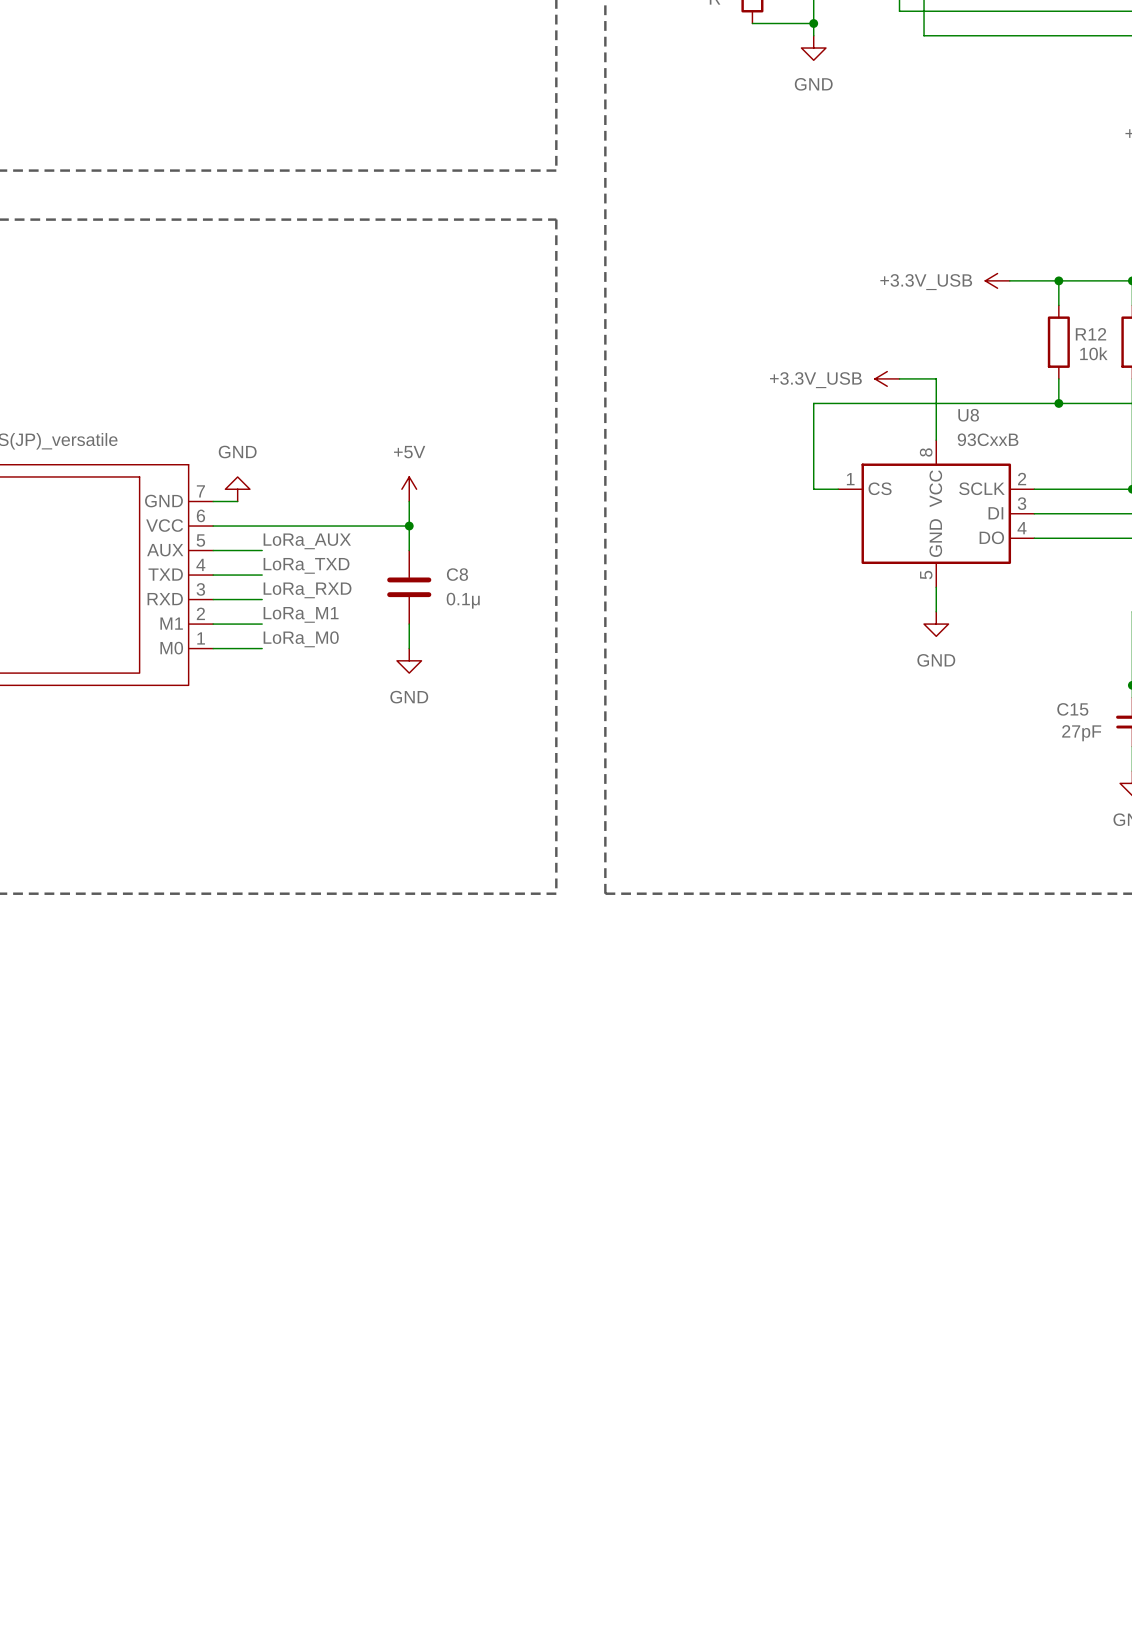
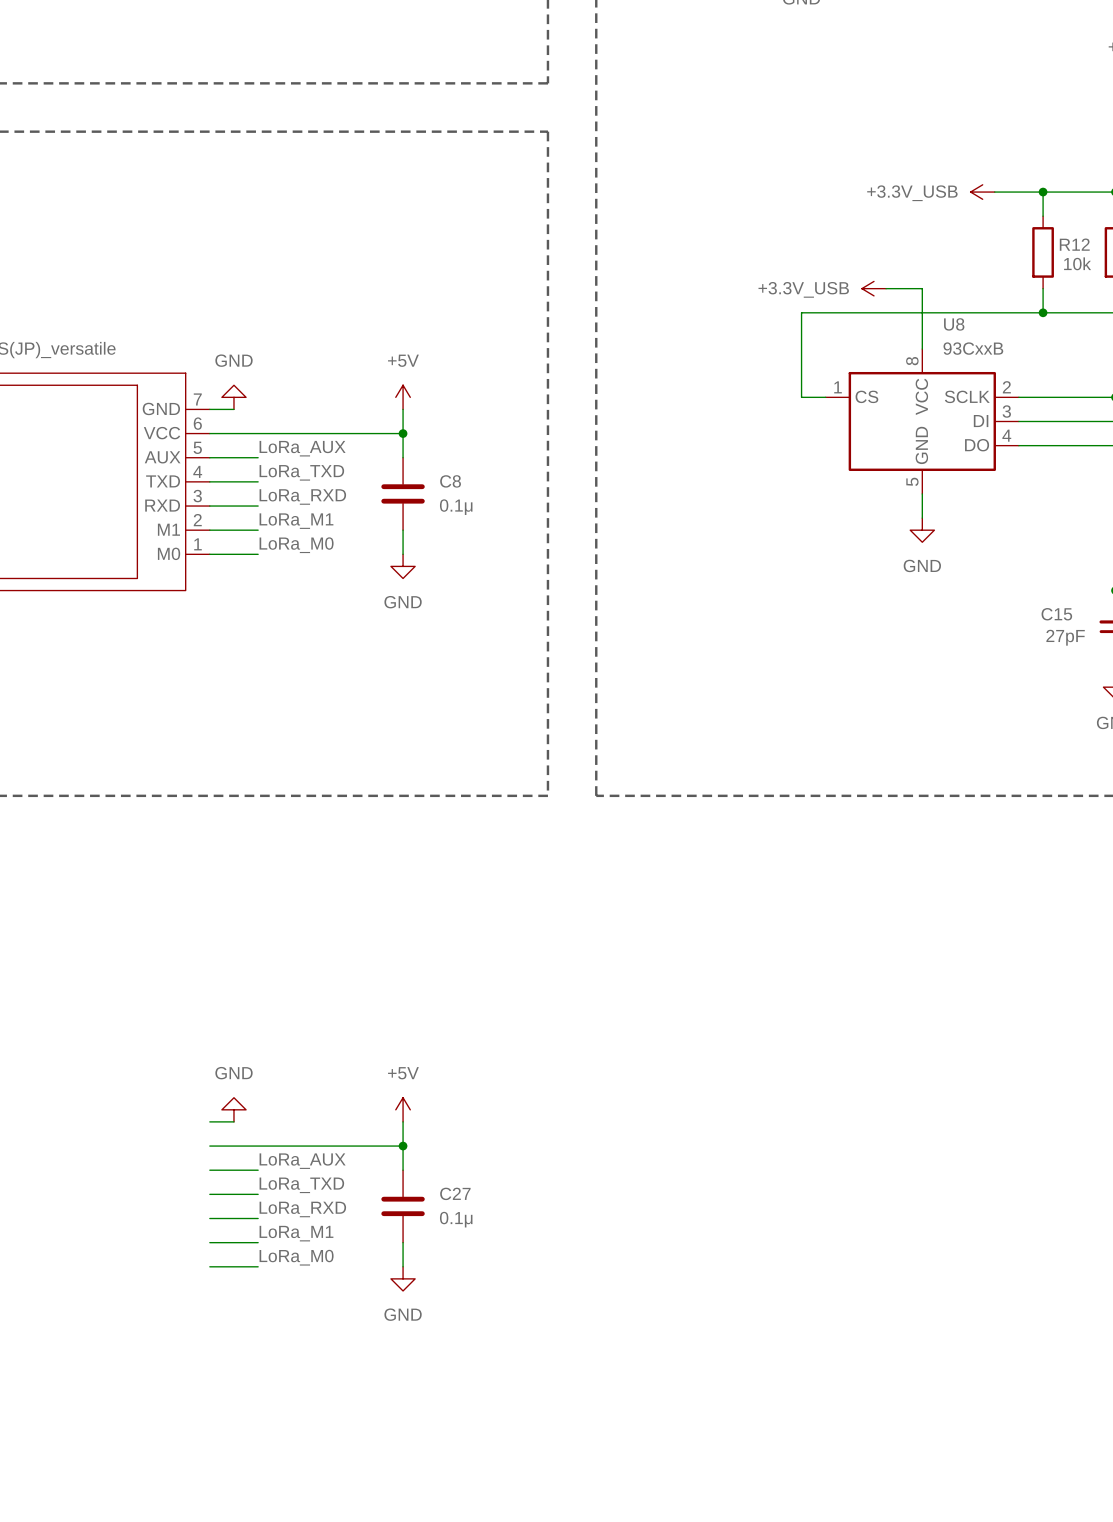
power symbol: none -> GND (233, 1109)
power symbol: none -> +5V (403, 1109)
wire: none -> (209, 1121) (233, 1121)
wire: none -> (403, 1121) (403, 1170)
wire: none -> (209, 1146) (403, 1146)
junction: none -> (403, 1146)
label: none -> LoRa_AUX (302, 1161)
wire: none -> (209, 1170) (258, 1170)
label: none -> LoRa_TXD (301, 1185)
wire: none -> (209, 1194) (258, 1194)
C27: none -> 0.1μ (403, 1206)
label: none -> LoRa_RXD (302, 1209)
wire: none -> (209, 1218) (258, 1218)
label: none -> LoRa_M1 (296, 1233)
wire: none -> (209, 1242) (258, 1242)
wire: none -> (403, 1242) (403, 1266)
label: none -> LoRa_M0 (296, 1257)
wire: none -> (209, 1266) (258, 1266)
power symbol: none -> GND (403, 1278)

